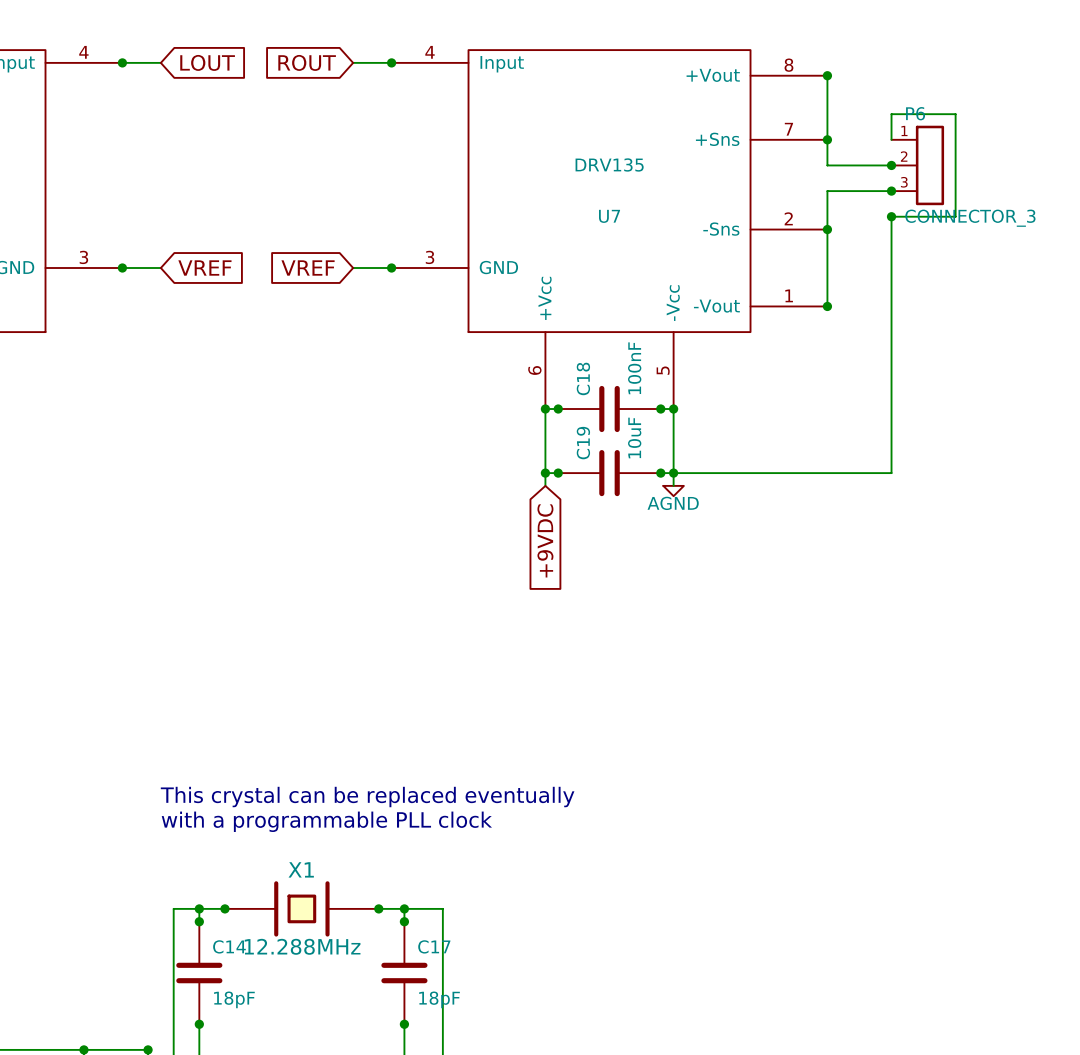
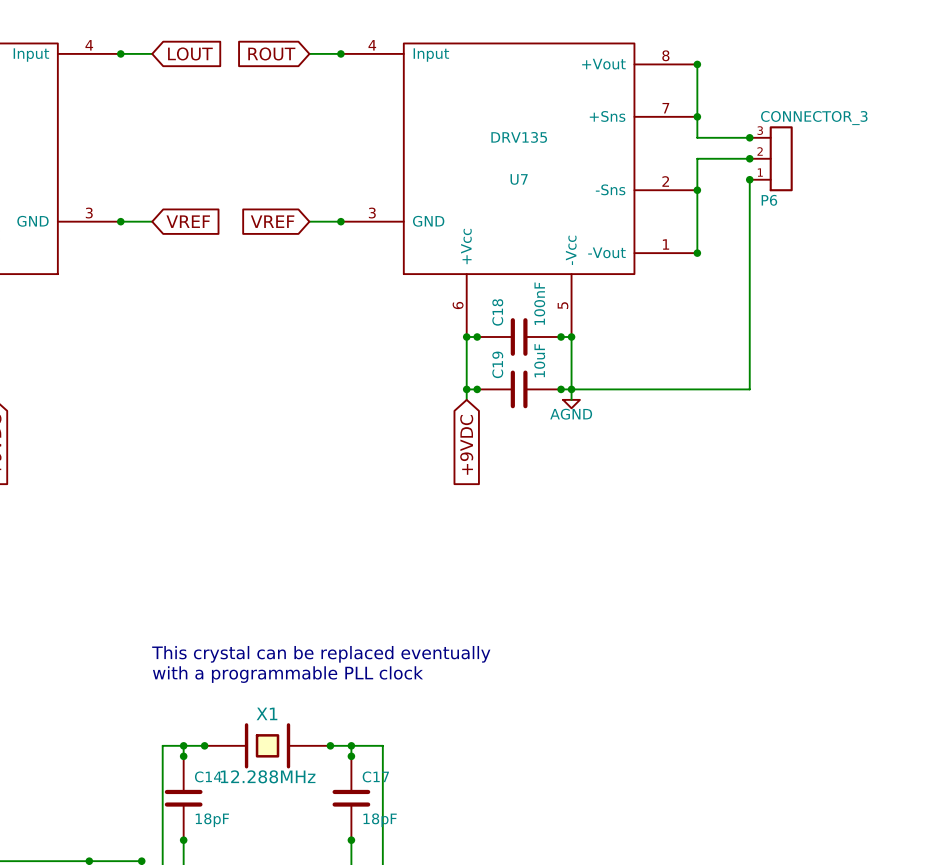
wire: (891, 139) (891, 114) (955, 114) (955, 216) (891, 216) -> none
P6 flip: as is (929, 165) -> up-down (781, 158)

